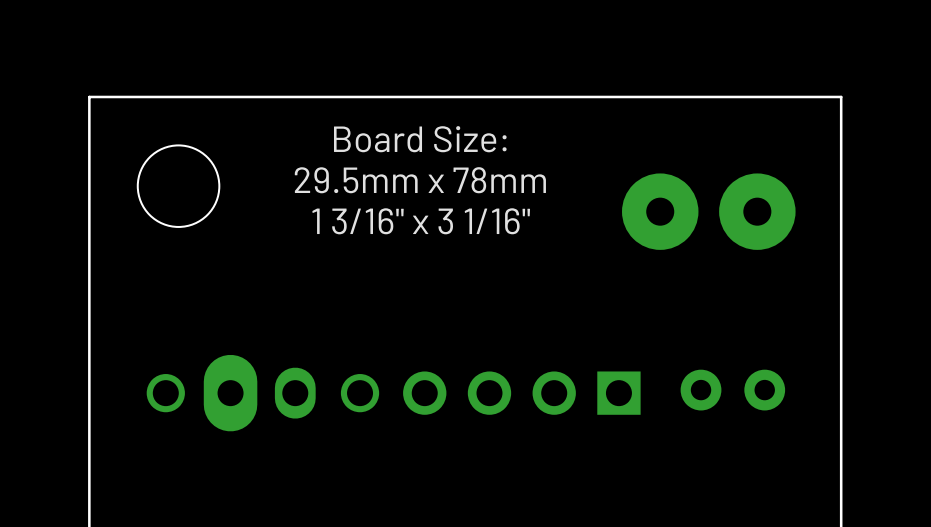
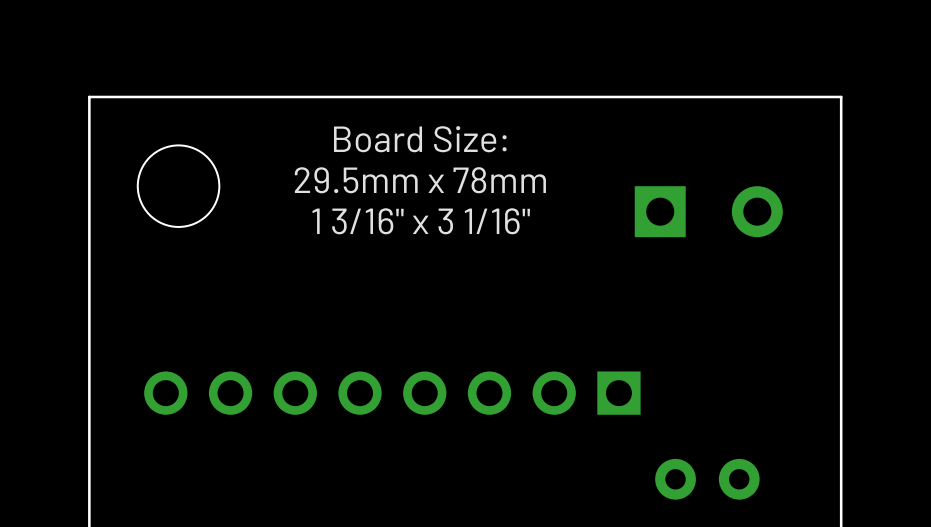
part footprint: [622, 173, 796, 250] -> [634, 186, 783, 238]
part footprint: [146, 354, 641, 432] -> [144, 371, 641, 415]
part position: (732, 390) -> (707, 479)

